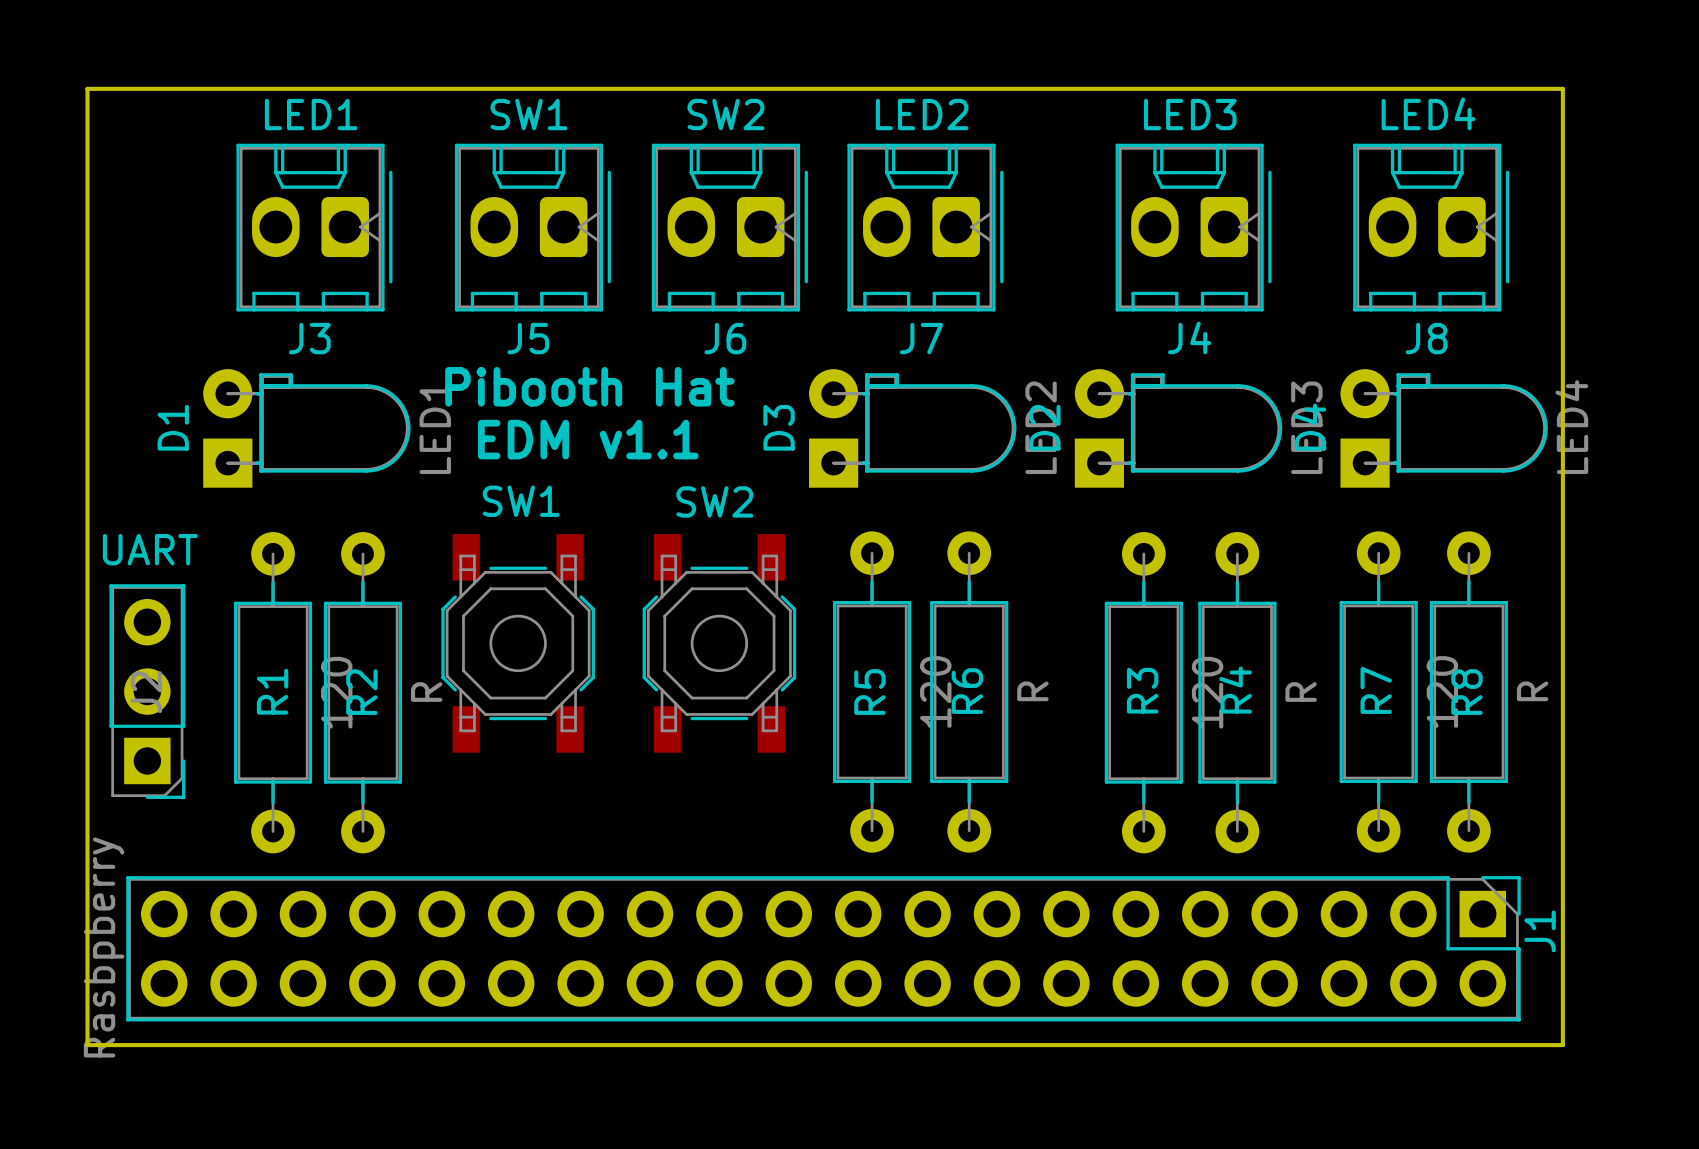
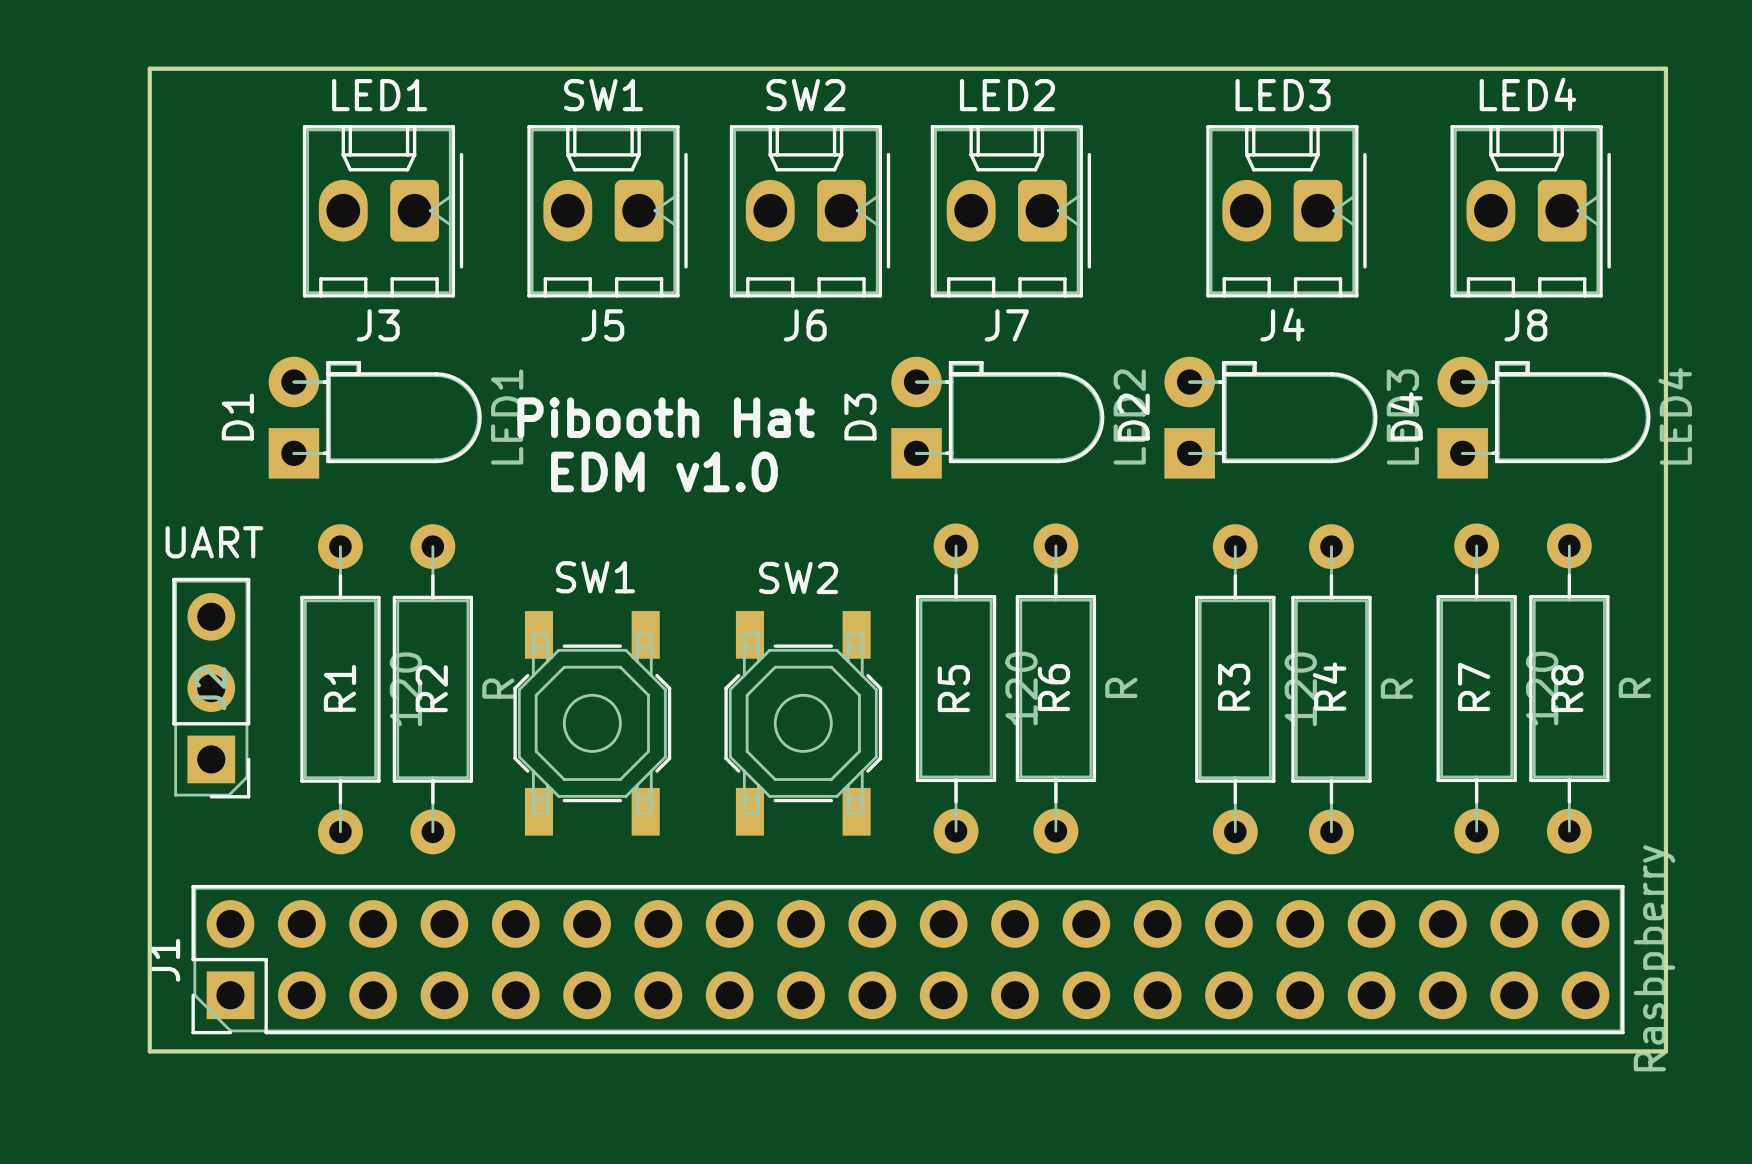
text: Pibooth Hat (589, 386) -> none
text: EDM v1.1 (588, 439) -> Pibooth Hat (666, 417)
text: none -> EDM v1.0 (664, 471)
SW1 position: (518, 643) -> (592, 723)
SW2 position: (719, 643) -> (803, 723)
J1 rotation: 0° (823, 948) -> 180° (908, 959)

